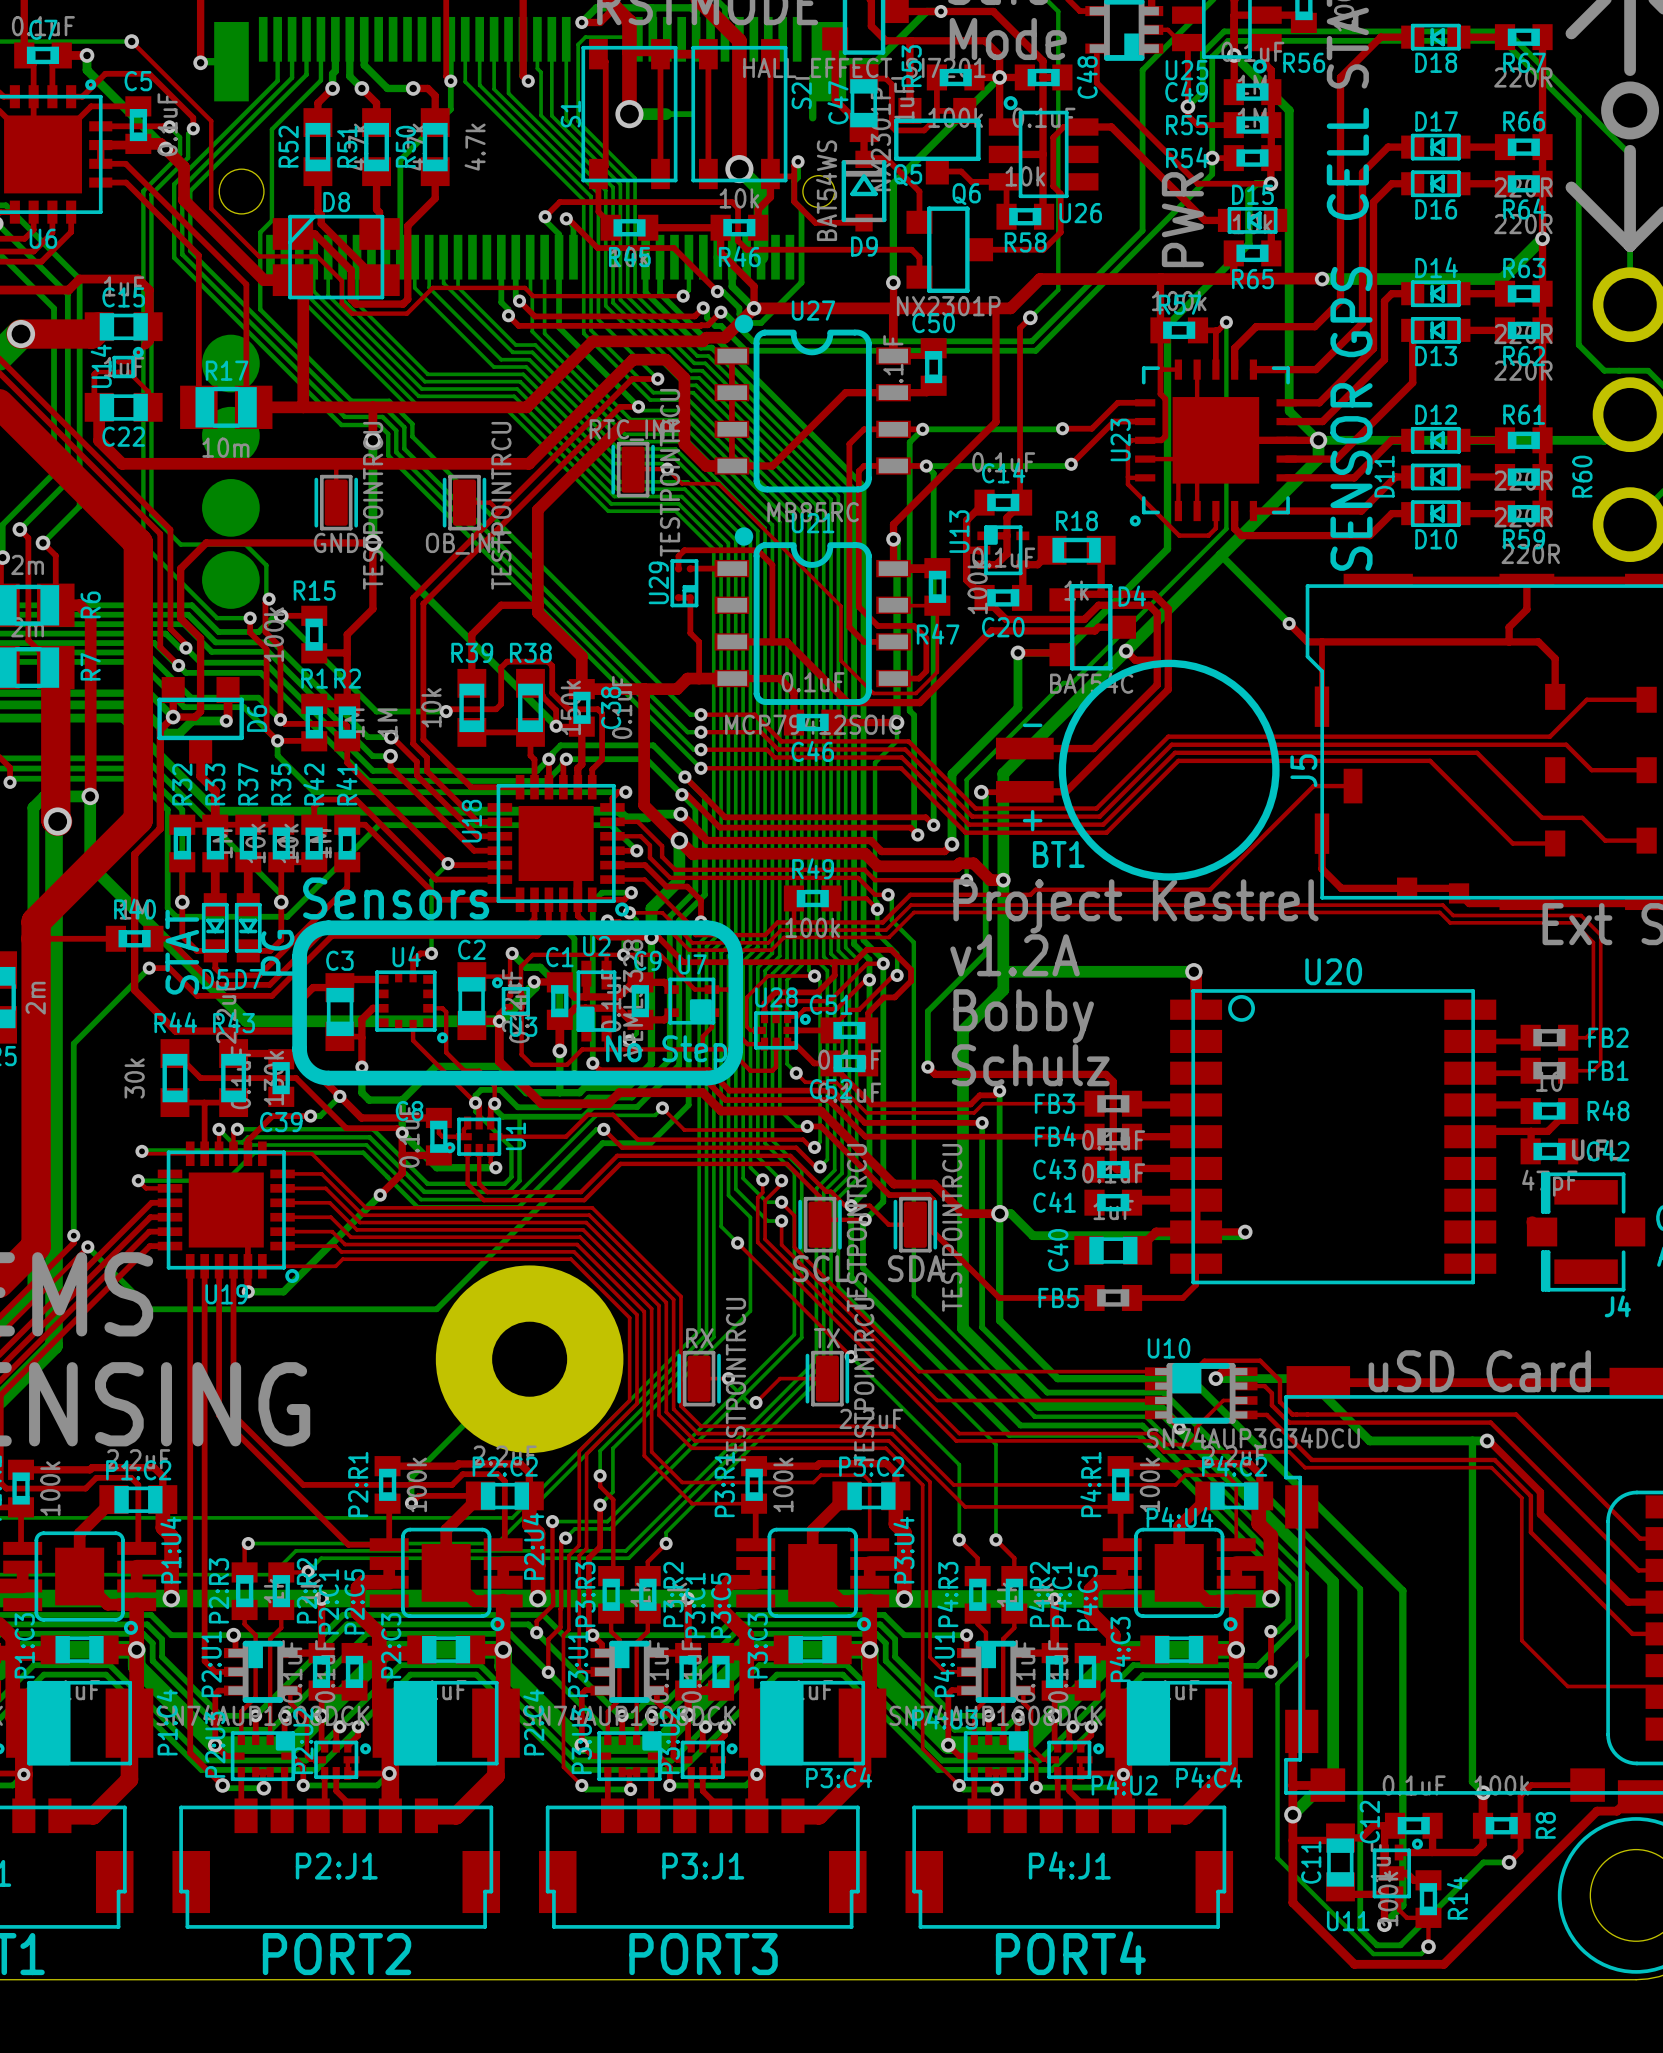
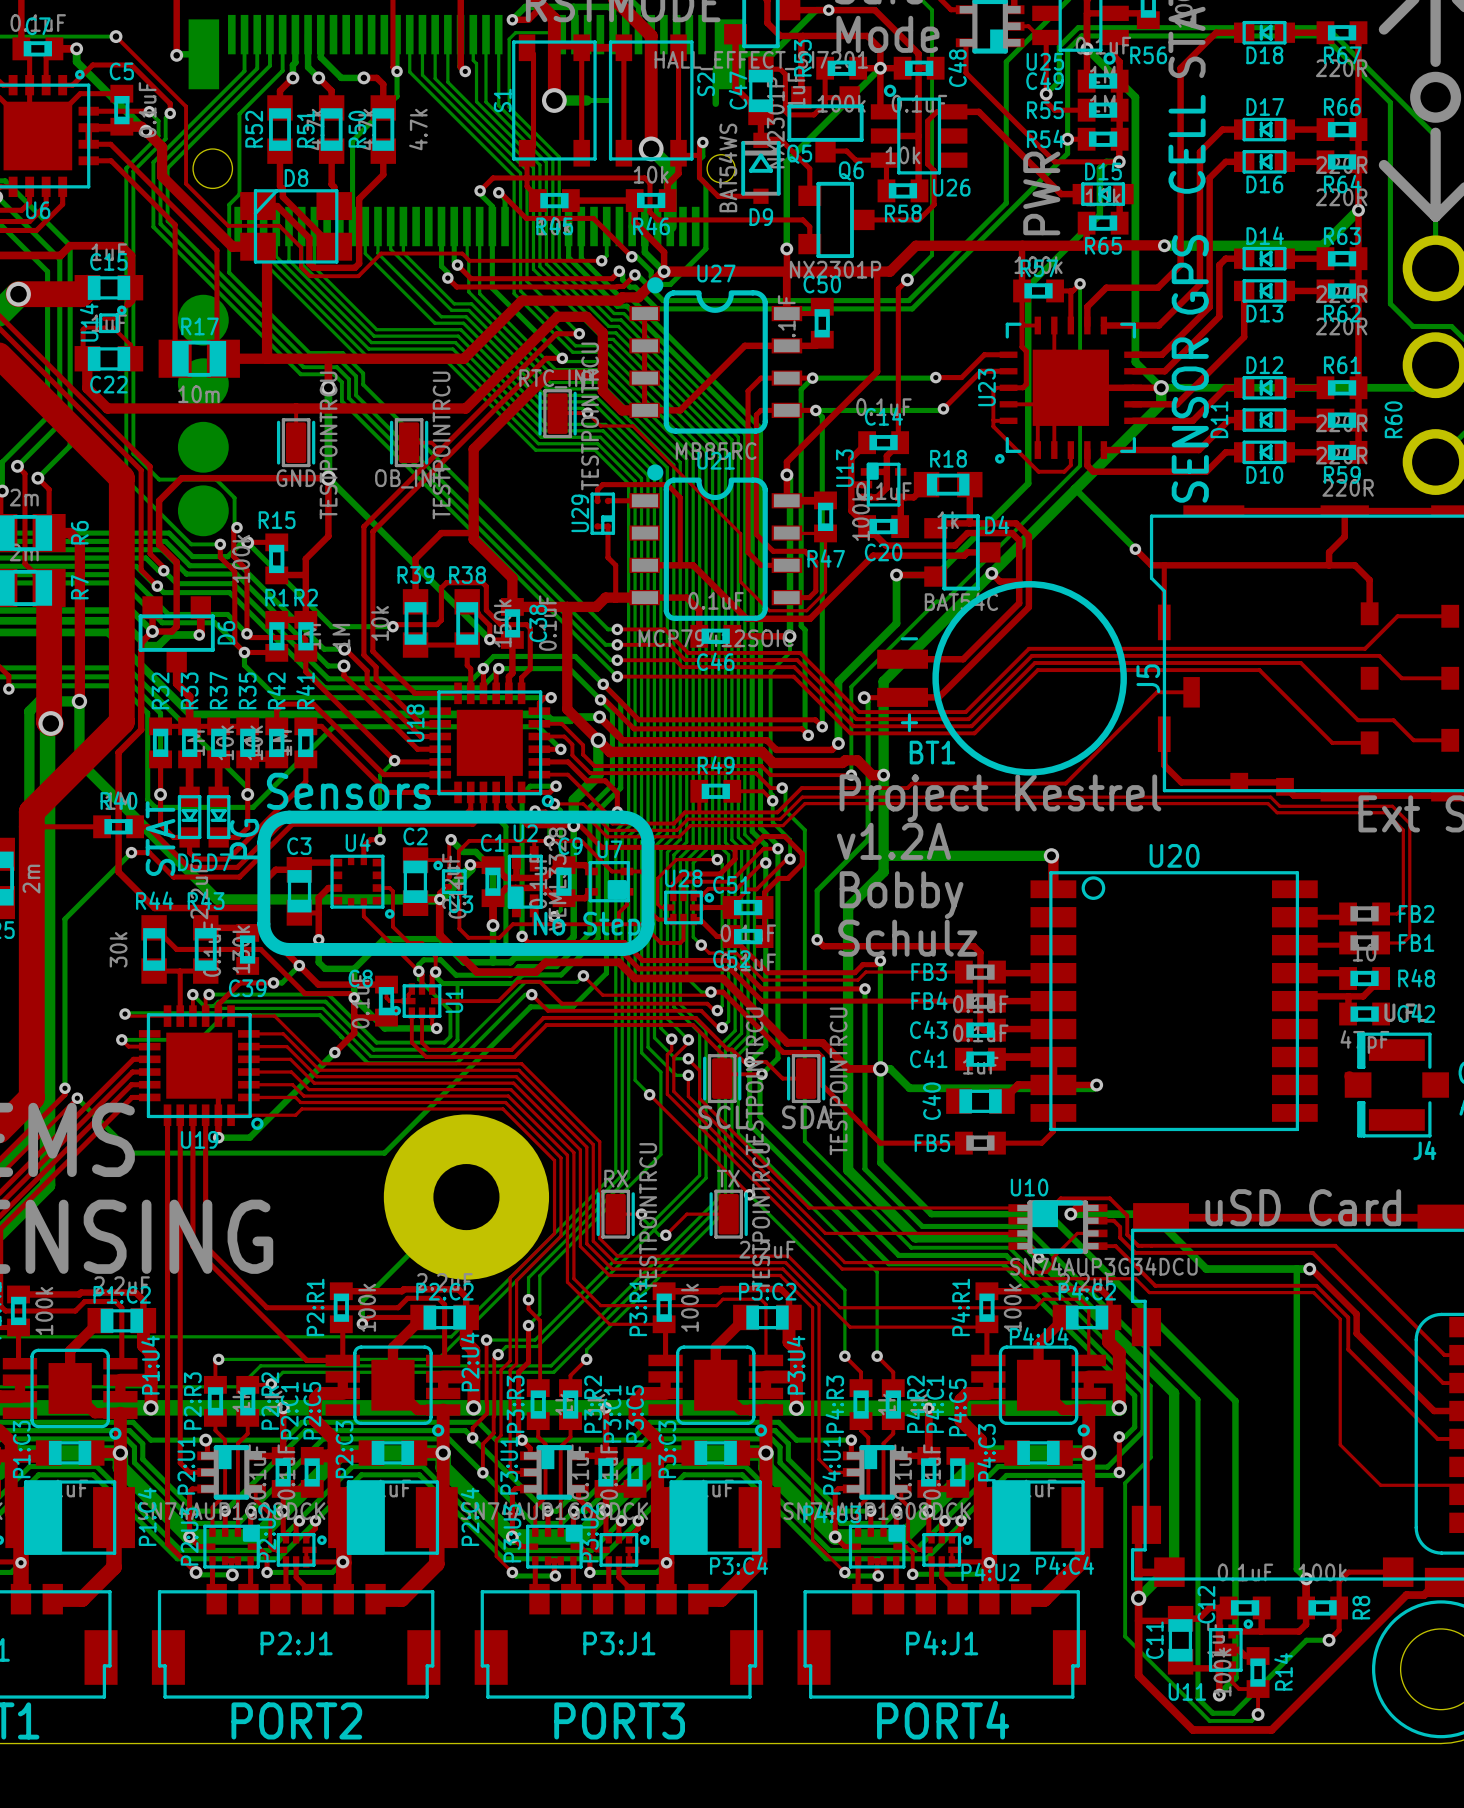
R49 value: 100k (812, 927) -> none

